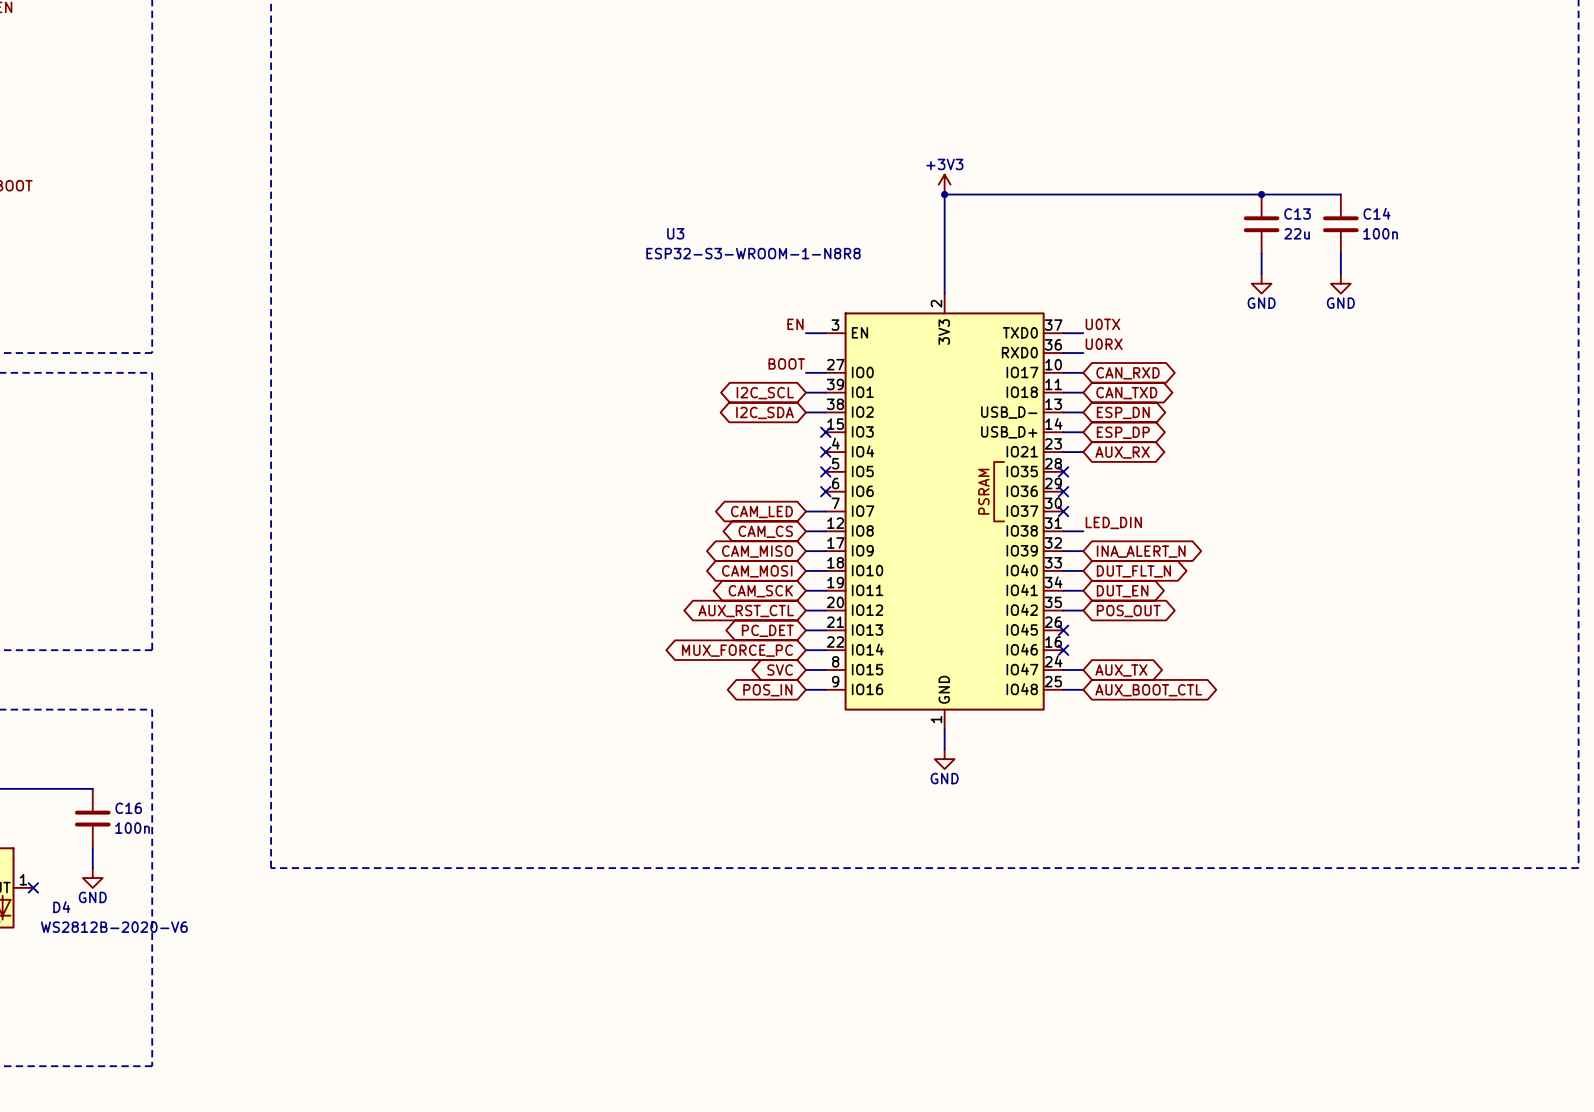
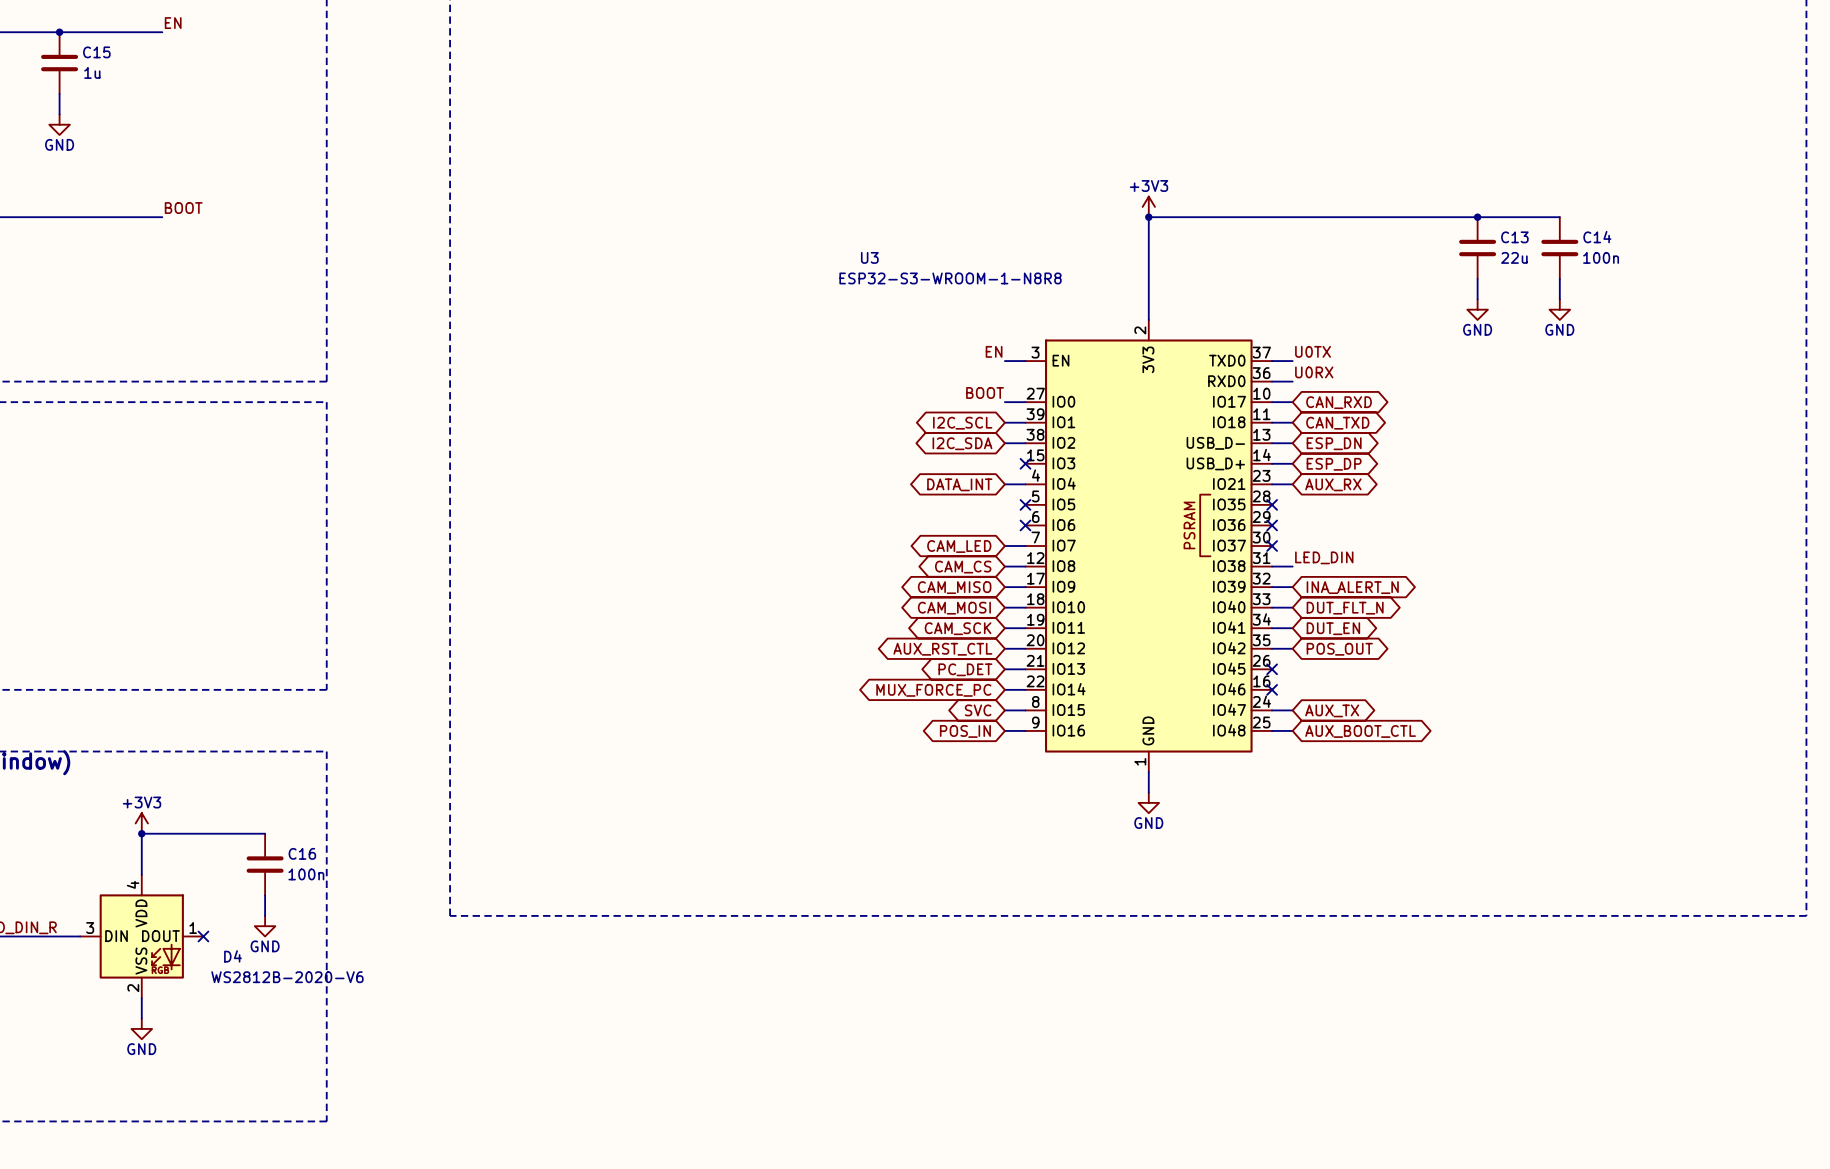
global label: none -> DATA_INT (959, 484)
wire: none -> (1004, 484) (1025, 484)
no-connect mark: (825, 452) -> none

